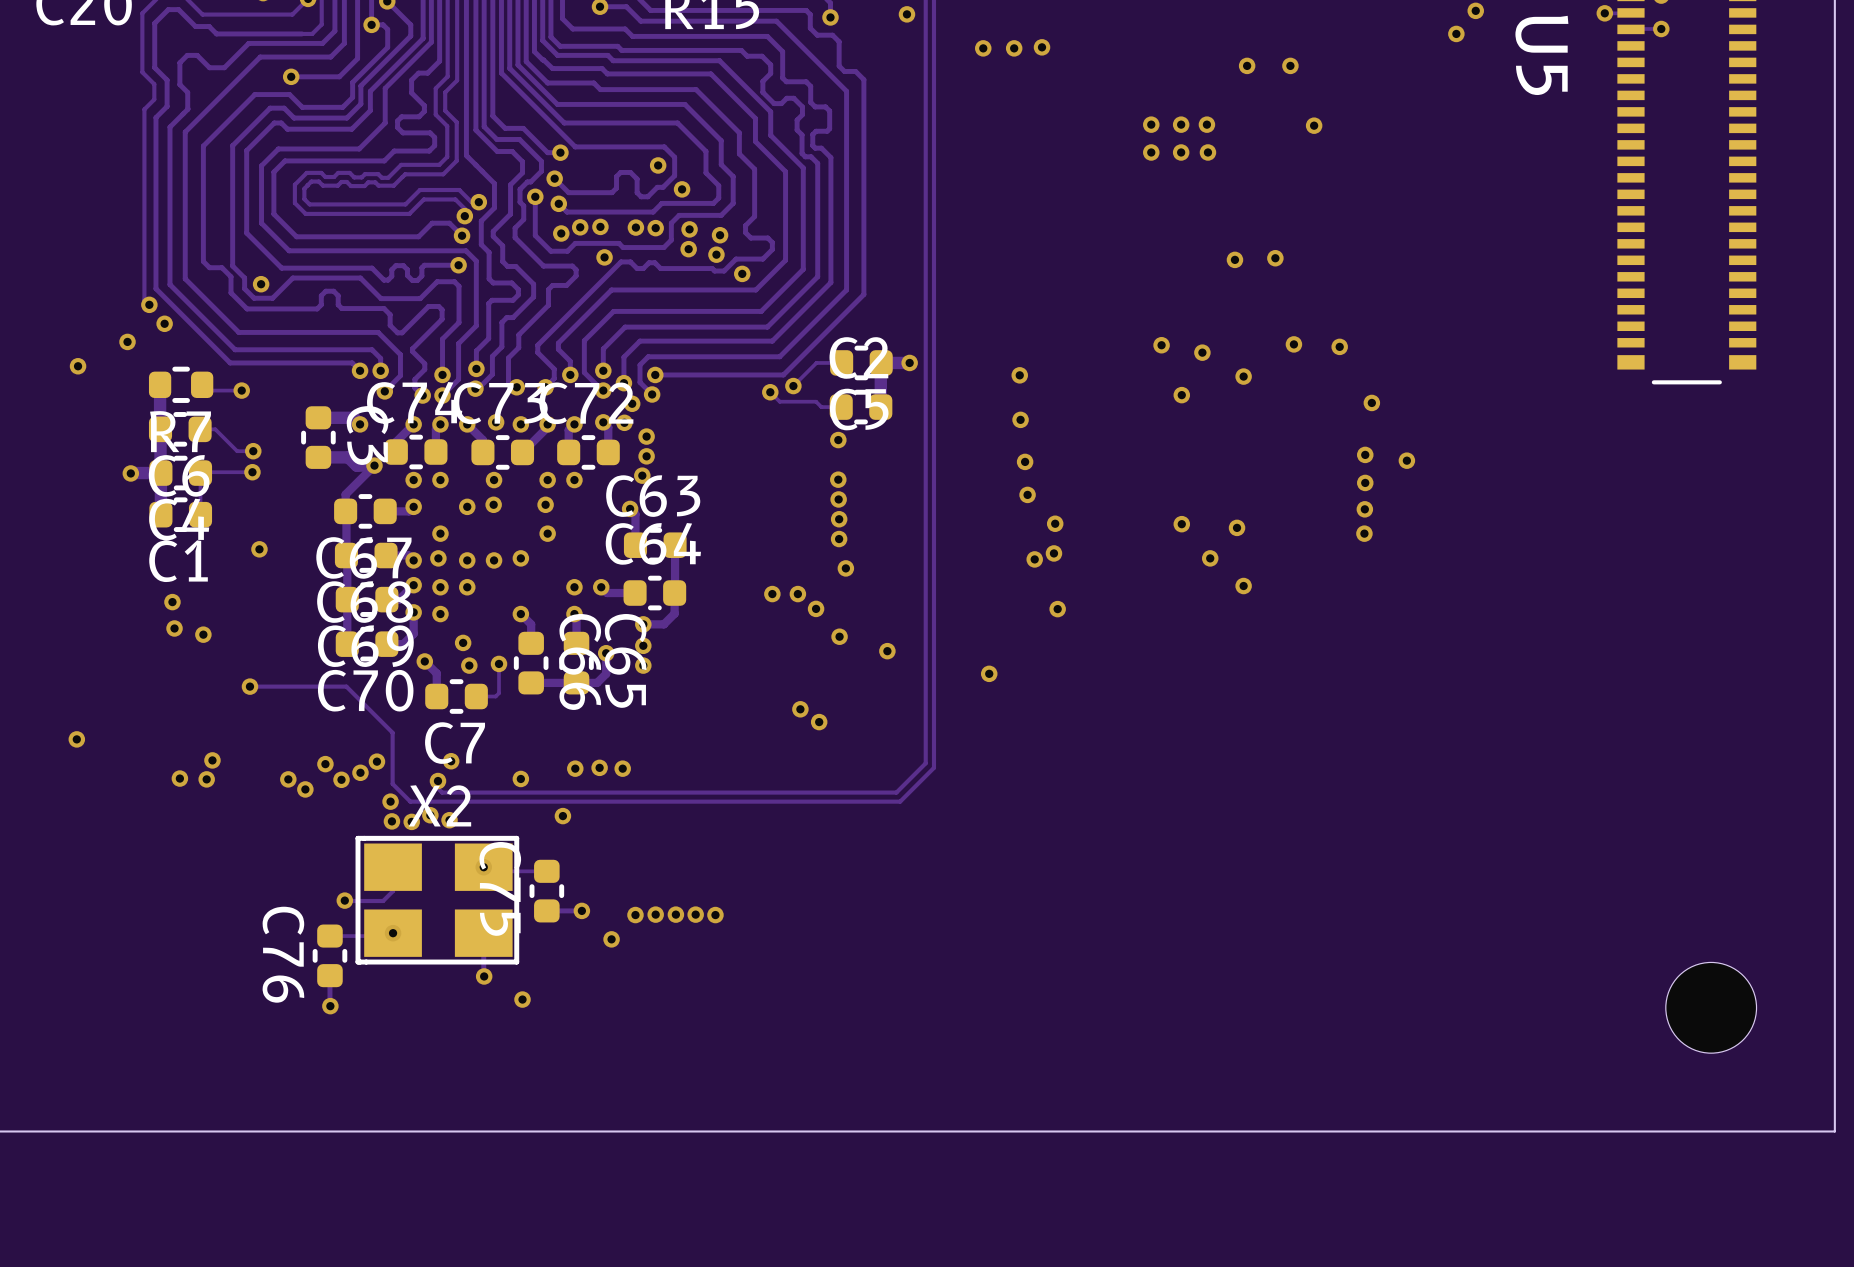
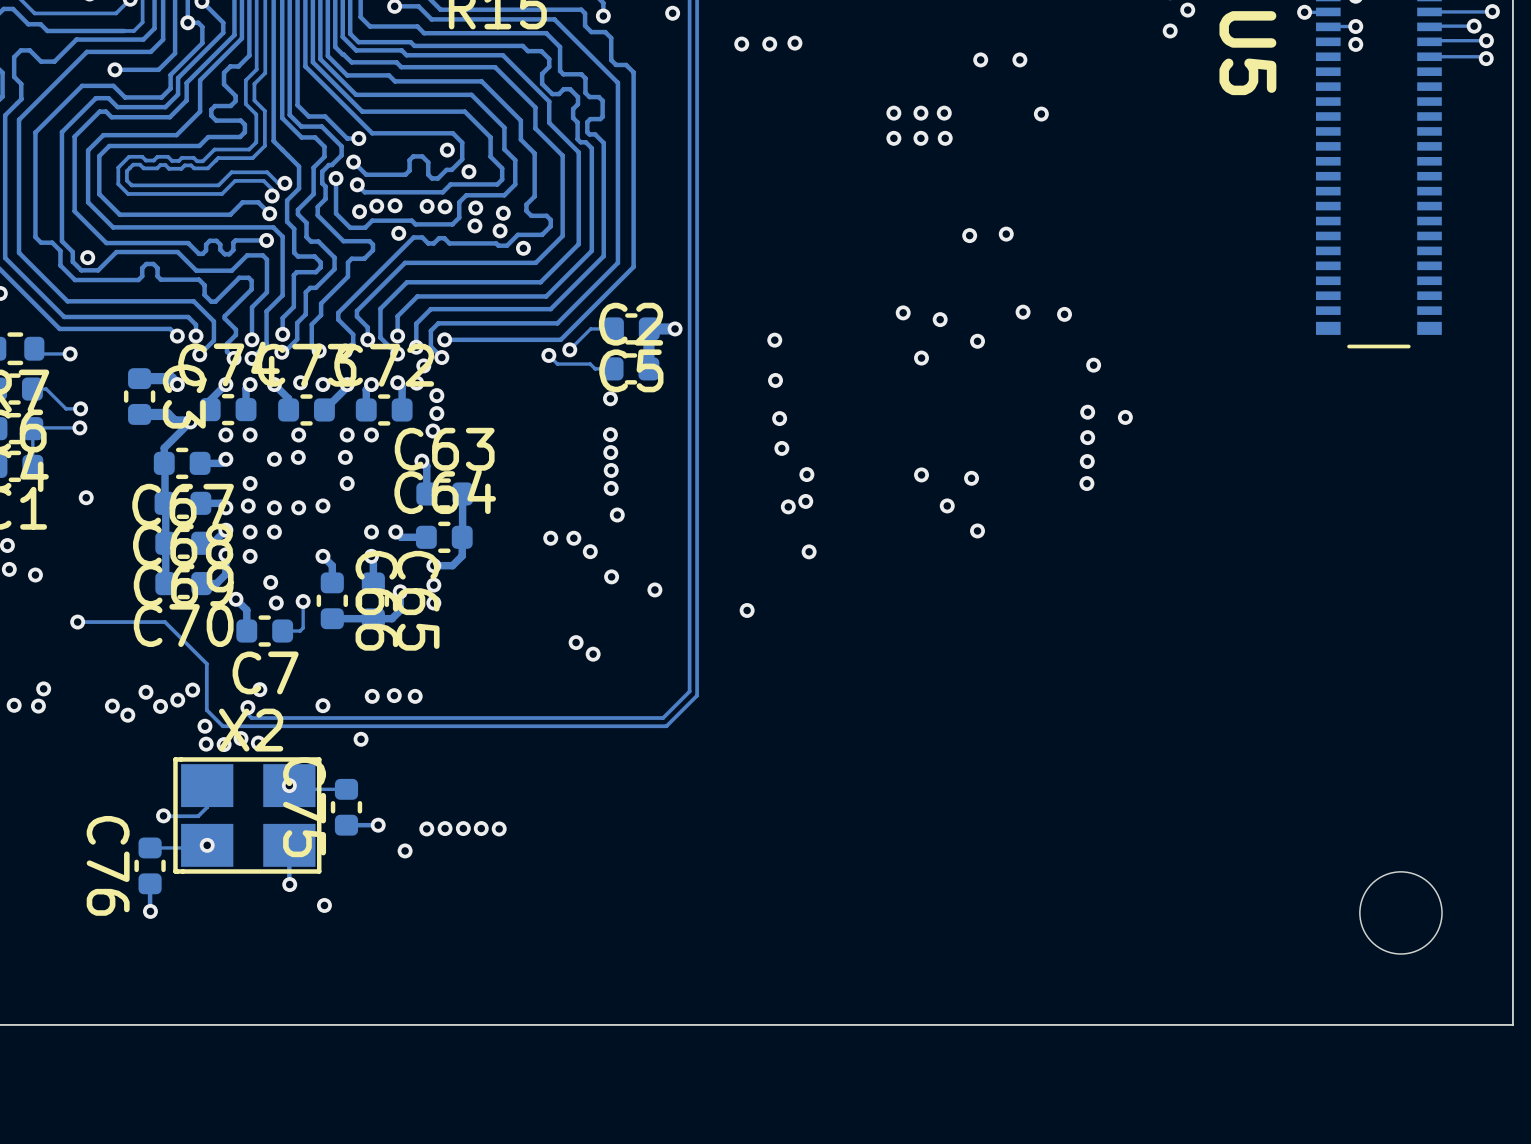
track: none -> (1492, 11) (1429, 11)
via: none -> (1492, 11)
track: none -> (1474, 26) (1429, 26)
via: none -> (1474, 26)
track: none -> (1486, 40) (1429, 41)
via: none -> (1486, 40)
via: none -> (1355, 44)
track: none -> (1429, 56) (1484, 56) (1486, 58)
via: none -> (1486, 58)

